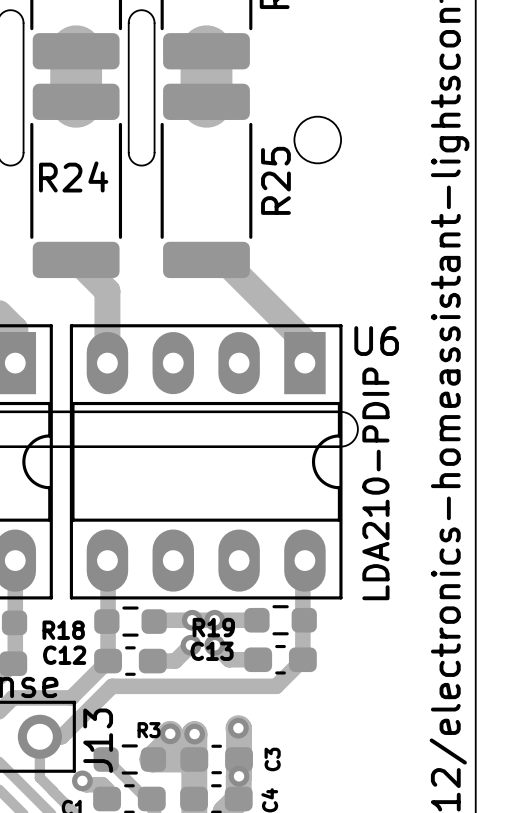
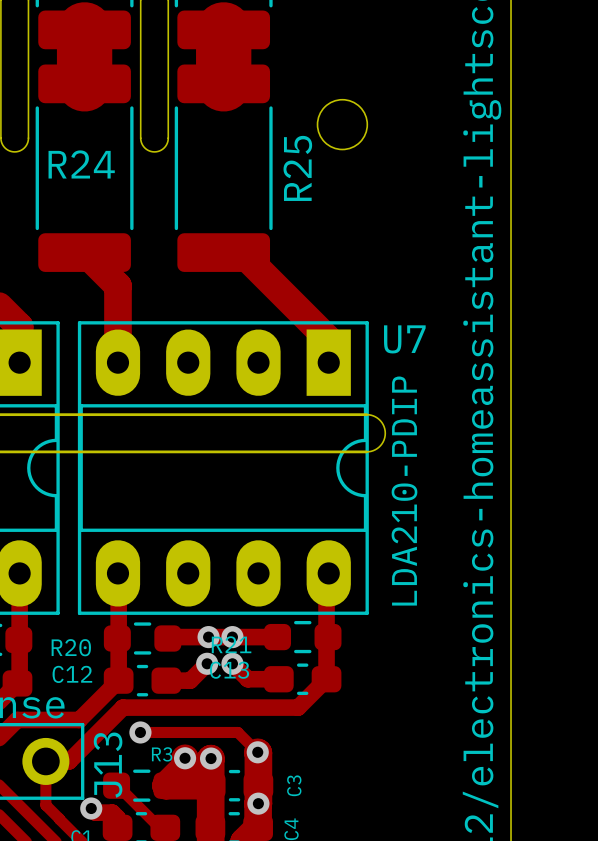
U6 name: U6 (376, 341) -> U7 (404, 339)
R19 name: R19 (213, 627) -> R21 (231, 644)
R18 name: R18 (63, 630) -> R20 (71, 647)
track: none -> (140, 732) (237, 732) (257, 752)
via: none -> (140, 732)

